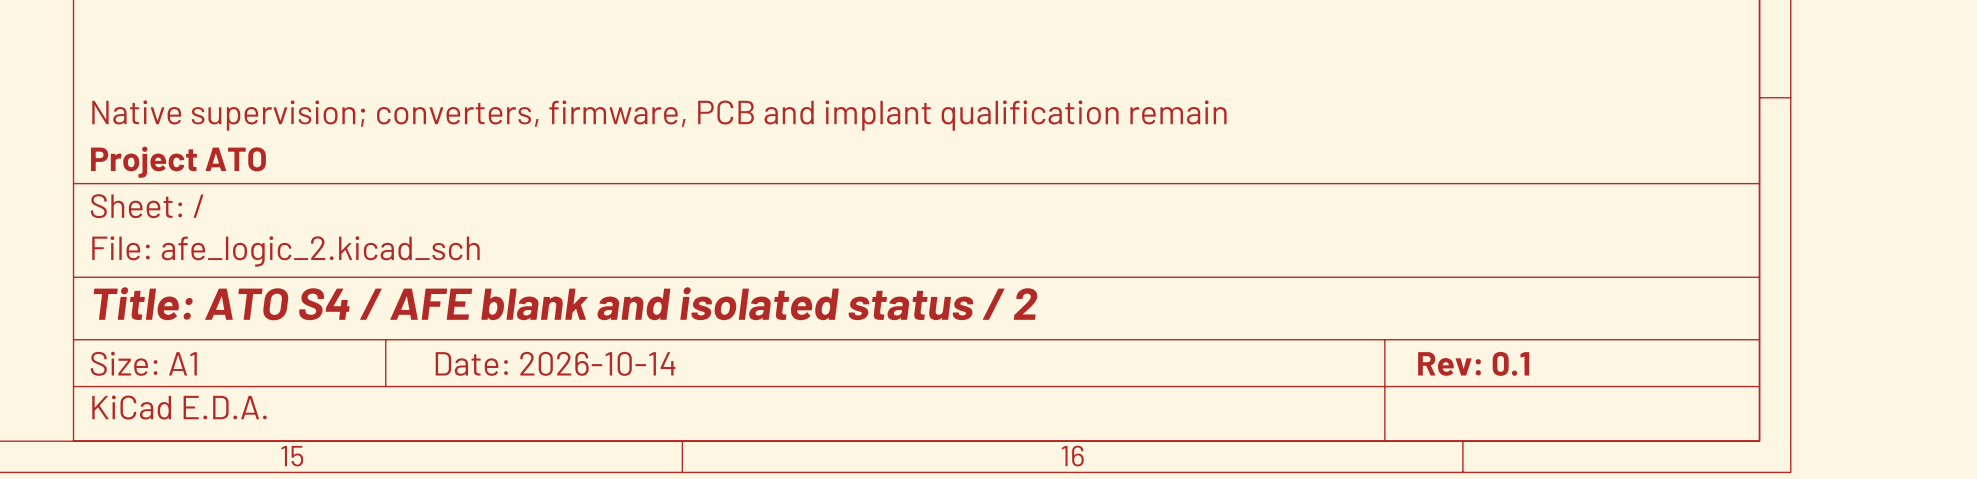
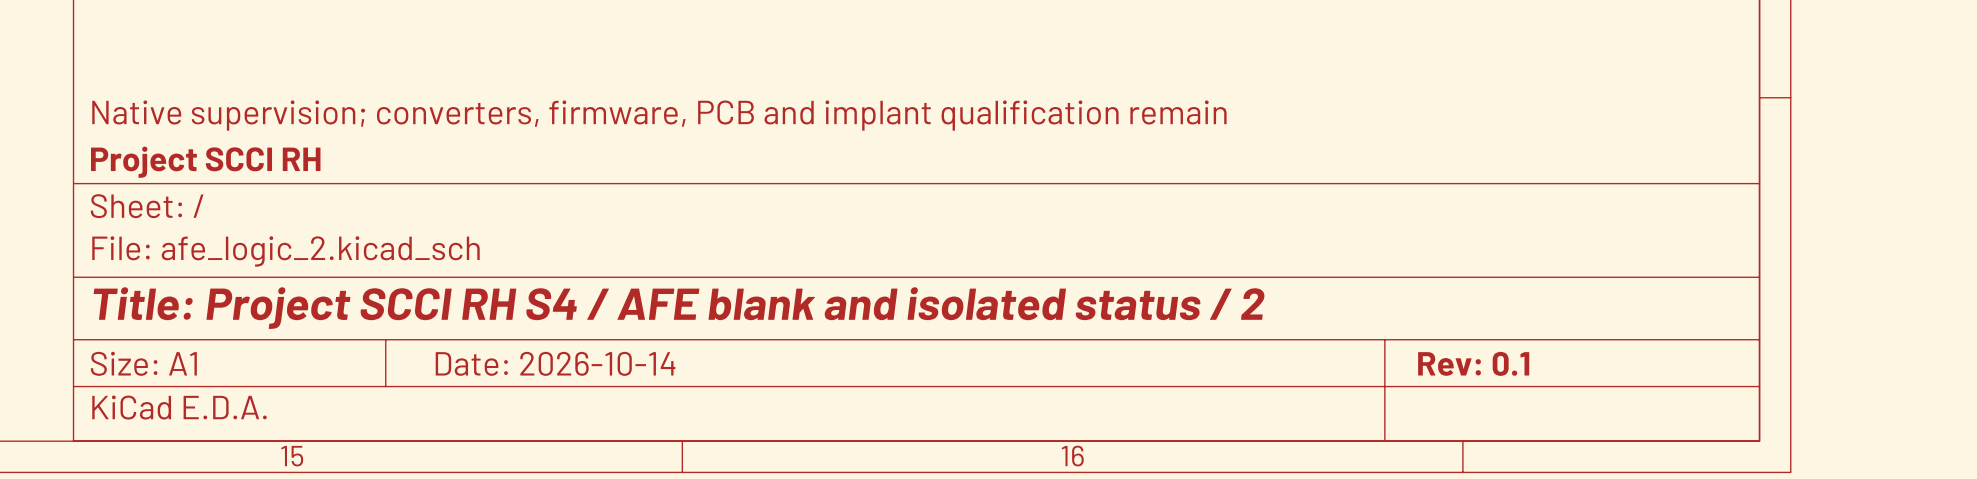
title block: Project ATO (178, 162) -> Project SCCI RH (205, 162)
title block: Title: ATO S4 / AFE blank and isolated status / 2 (565, 303) -> Title: Project SCCI RH S4 / AFE blank and isolated status / 2 (679, 308)

